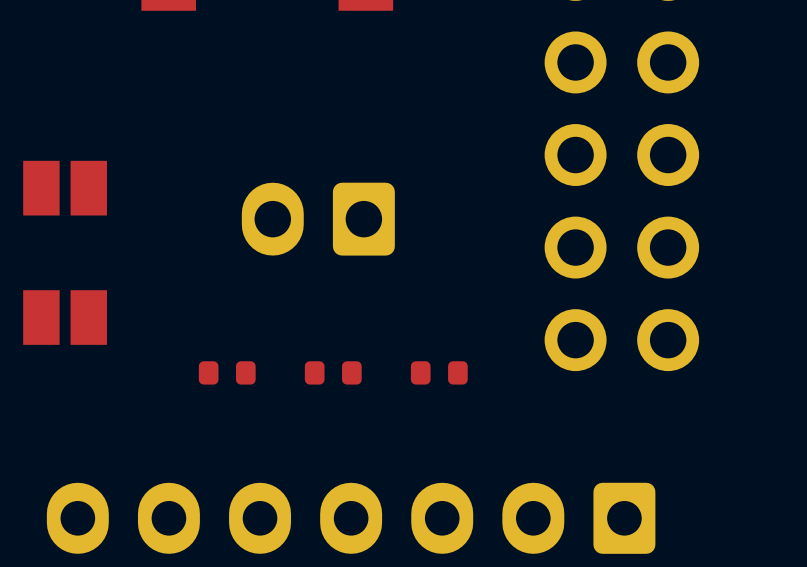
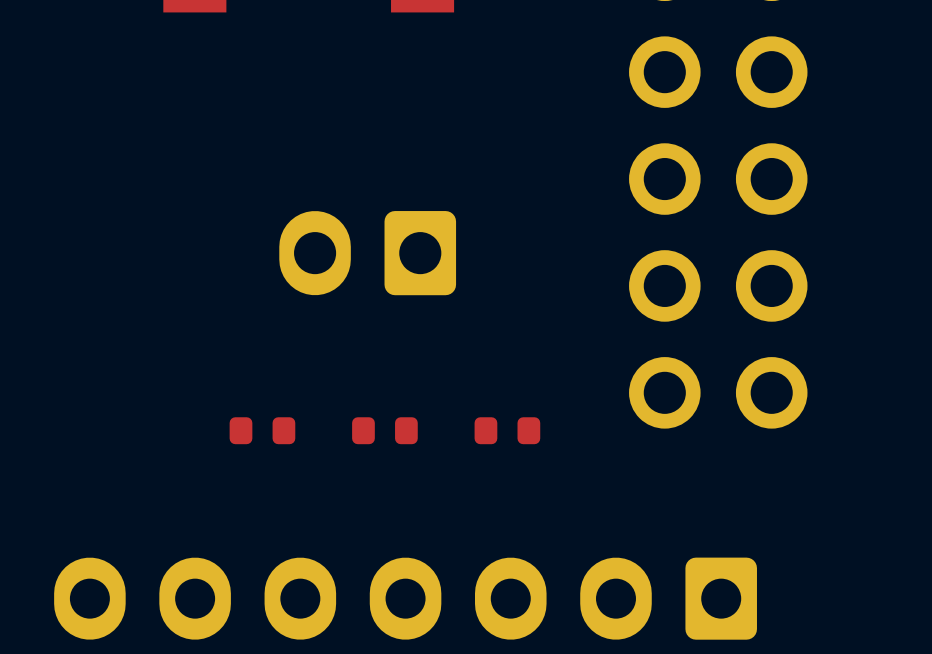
part: (65, 188) -> none
part: (65, 317) -> none

